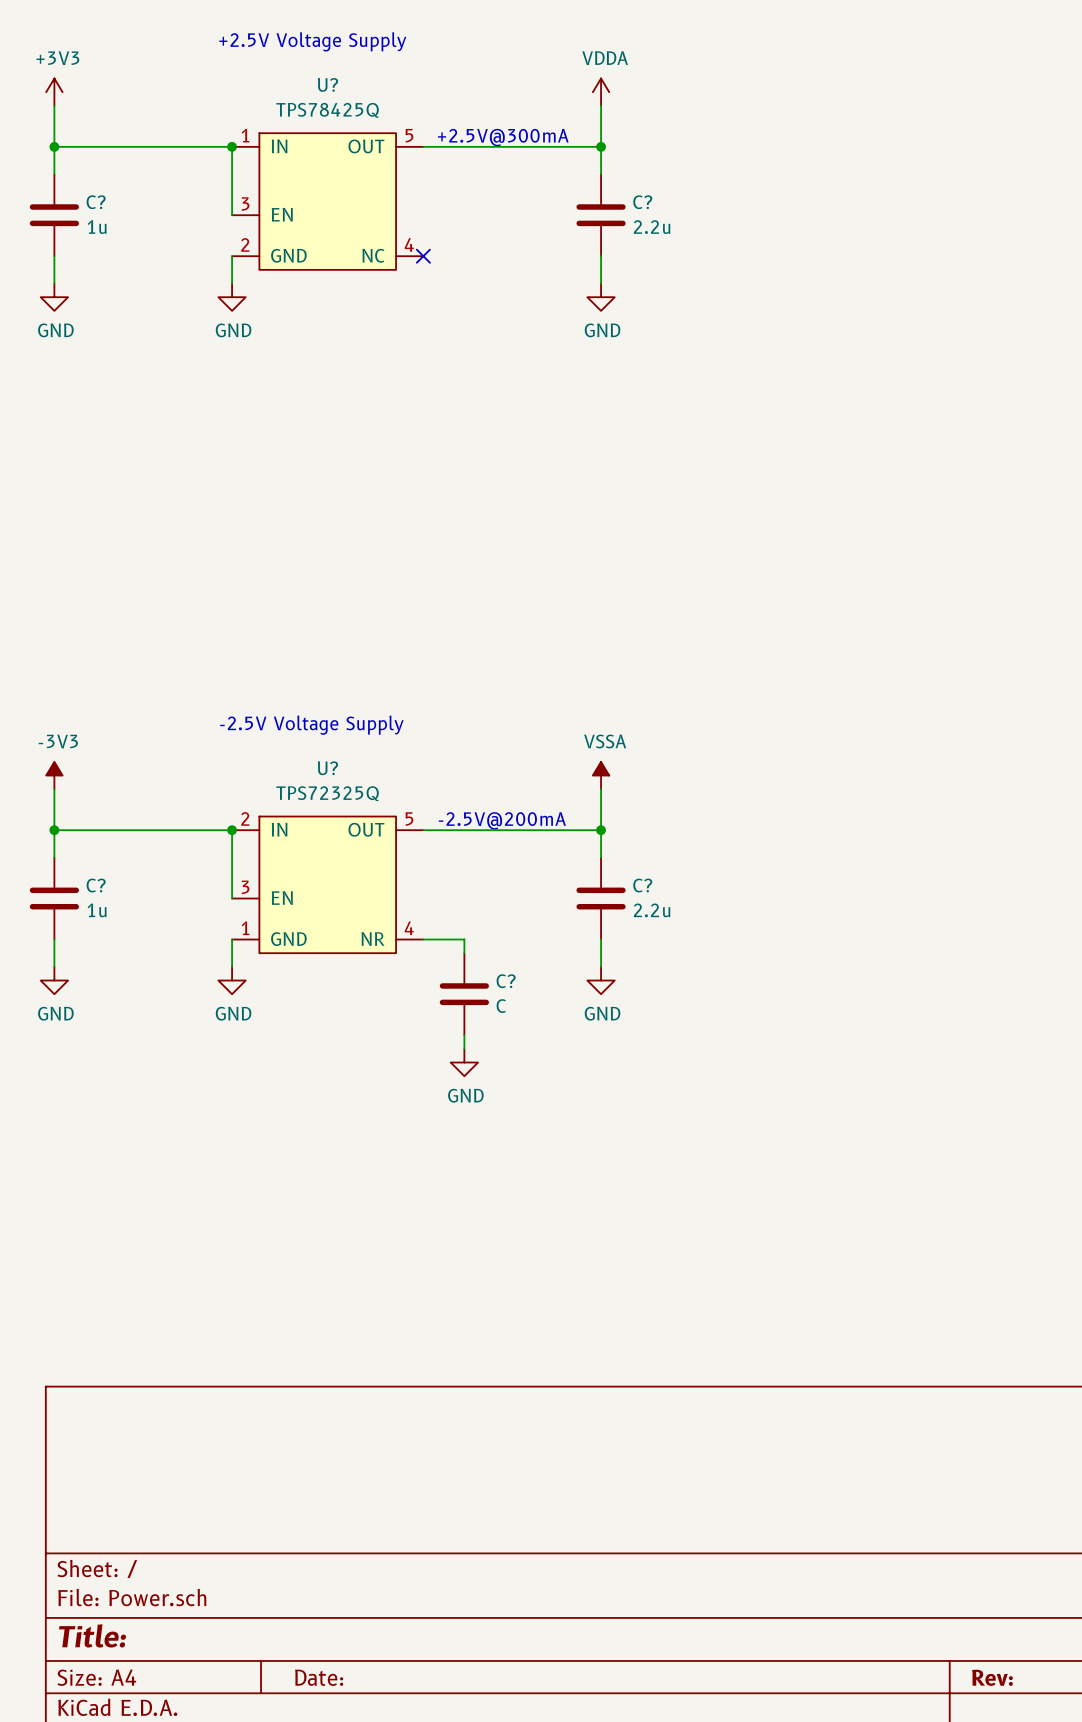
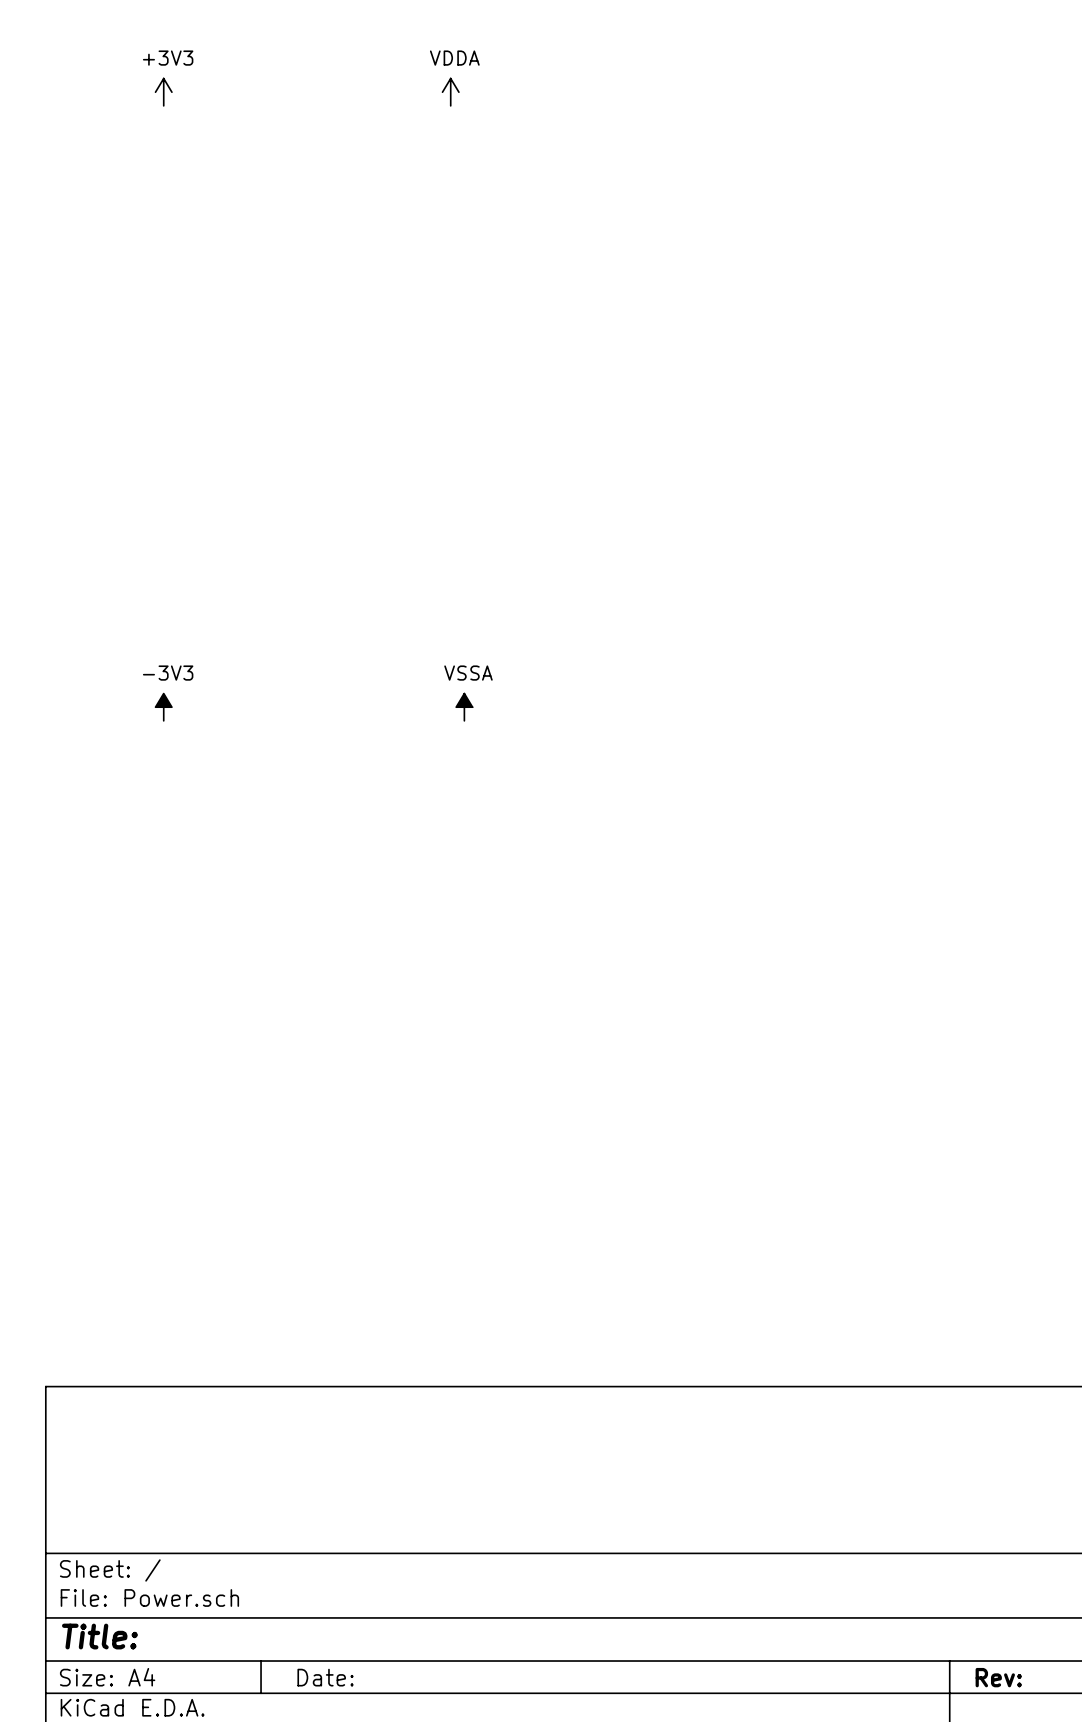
text: +2.5V Voltage Supply (312, 41) -> none
power symbol position: +3V3 (54, 92) -> +3V3 (163, 92)
power symbol position: VDDA (601, 92) -> VDDA (450, 92)
wire: (54, 105) (54, 174) -> none
wire: (601, 105) (601, 174) -> none
text: +2.5V@300mA (503, 137) -> none
wire: (54, 146) (232, 146) (232, 215) -> none
junction: (54, 146) -> none
junction: (232, 146) -> none
wire: (423, 146) (601, 146) -> none
junction: (601, 146) -> none
U?: TPS78425Q (327, 201) -> none
C?: 1u (54, 215) -> none
C?: 2.2u (601, 215) -> none
wire: (54, 256) (54, 283) -> none
wire: (232, 256) (232, 283) -> none
no-connect mark: (423, 256) -> none
wire: (601, 256) (601, 283) -> none
power symbol: GND (54, 297) -> none
power symbol: GND (232, 297) -> none
power symbol: GND (601, 297) -> none
text: -2.5V Voltage Supply (311, 725) -> none
power symbol position: -3V3 (54, 775) -> -3V3 (163, 707)
power symbol position: VSSA (601, 775) -> VSSA (464, 707)
wire: (54, 789) (54, 857) -> none
wire: (601, 789) (601, 857) -> none
text: -2.5V@200mA (502, 820) -> none
wire: (54, 830) (232, 830) (232, 898) -> none
junction: (54, 830) -> none
junction: (232, 830) -> none
wire: (423, 830) (601, 830) -> none
junction: (601, 830) -> none
U?: TPS72325Q (327, 884) -> none
C?: 1u (54, 898) -> none
C?: 2.2u (601, 898) -> none
wire: (54, 939) (54, 966) -> none
wire: (232, 939) (232, 966) -> none
wire: (423, 939) (464, 939) (464, 953) -> none
wire: (601, 939) (601, 966) -> none
power symbol: GND (54, 980) -> none
power symbol: GND (232, 980) -> none
power symbol: GND (601, 980) -> none
C?: C (464, 994) -> none
wire: (464, 1035) (464, 1048) -> none
power symbol: GND (464, 1062) -> none

